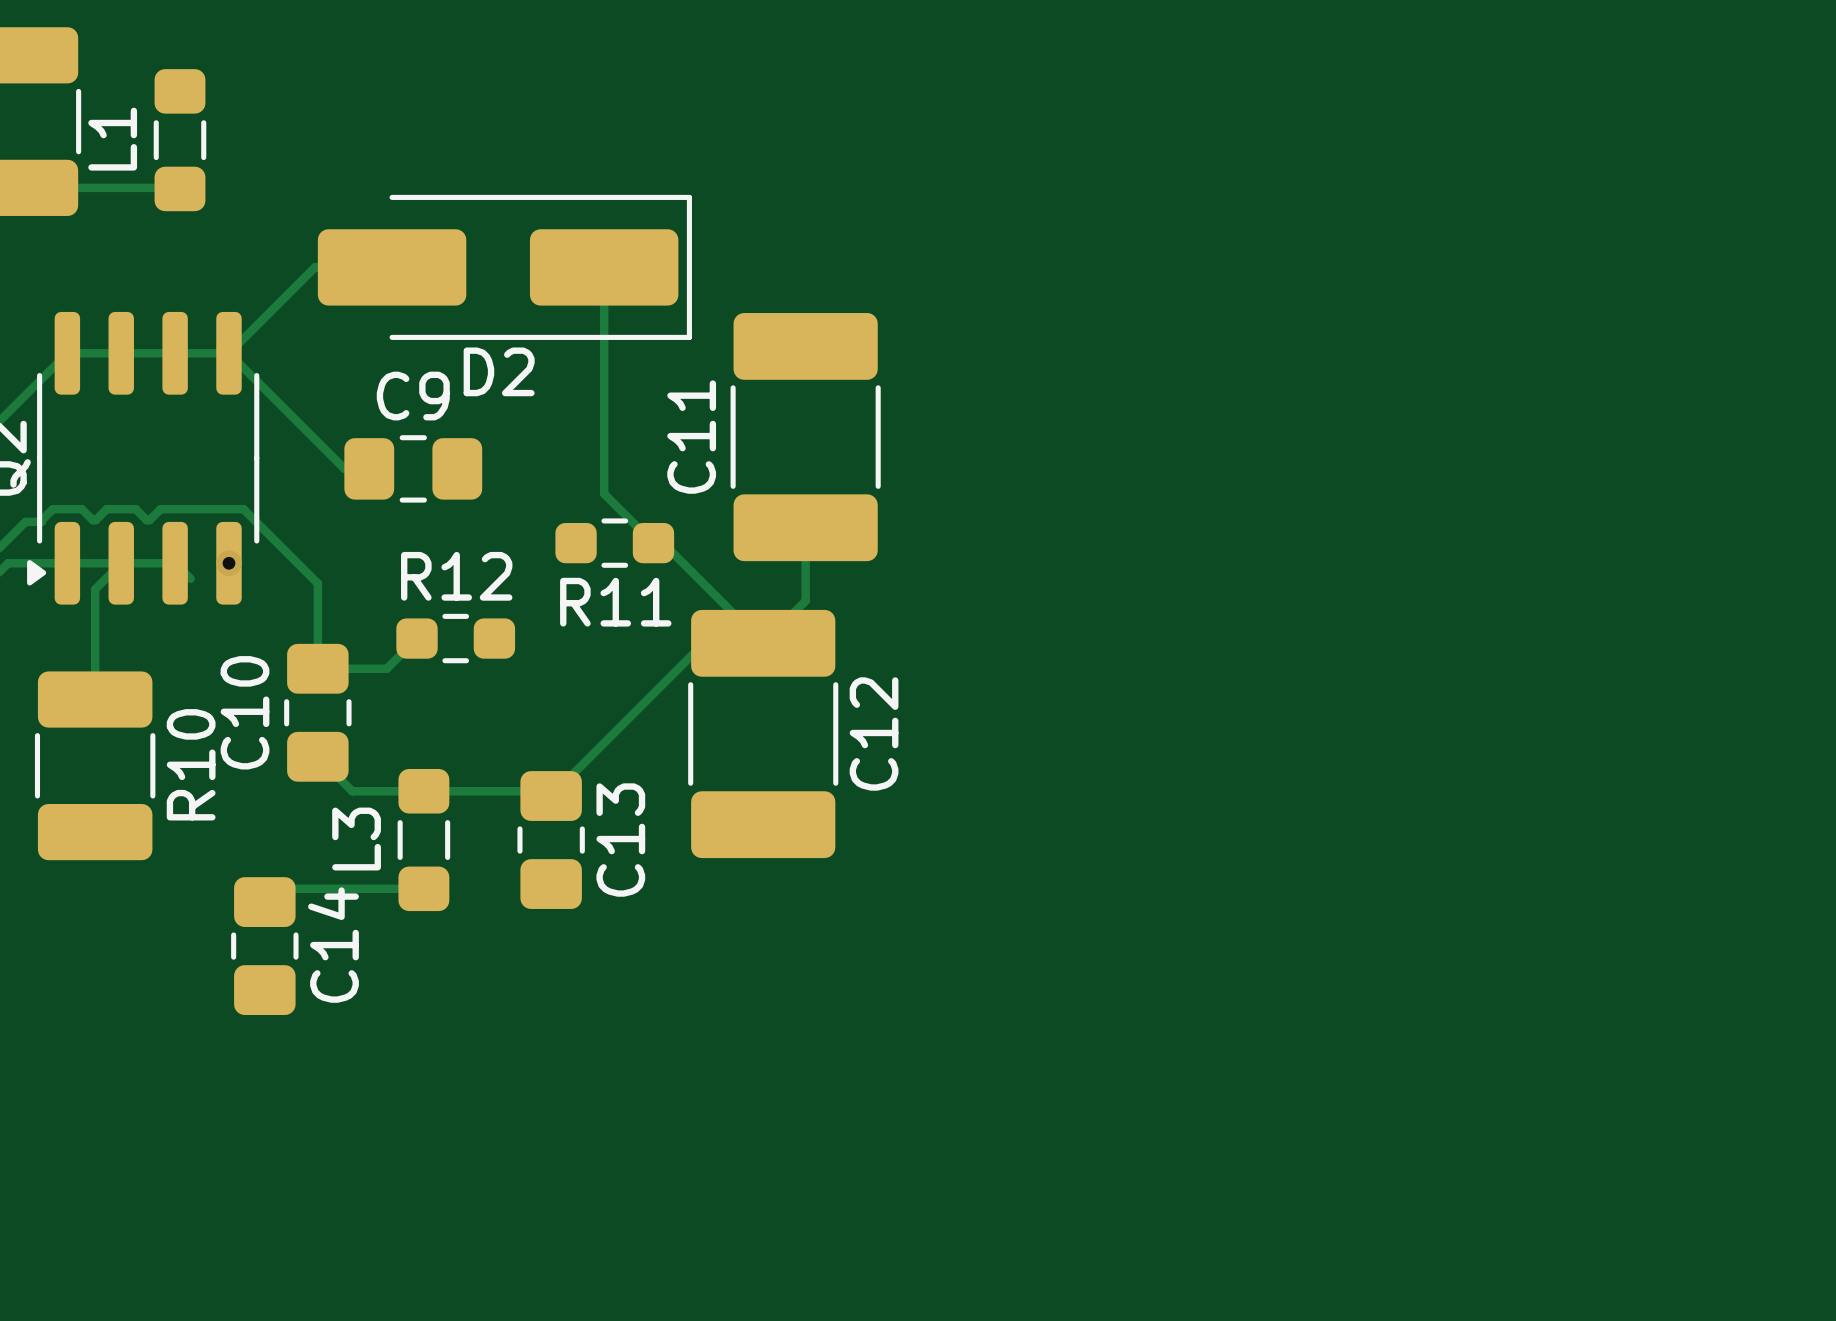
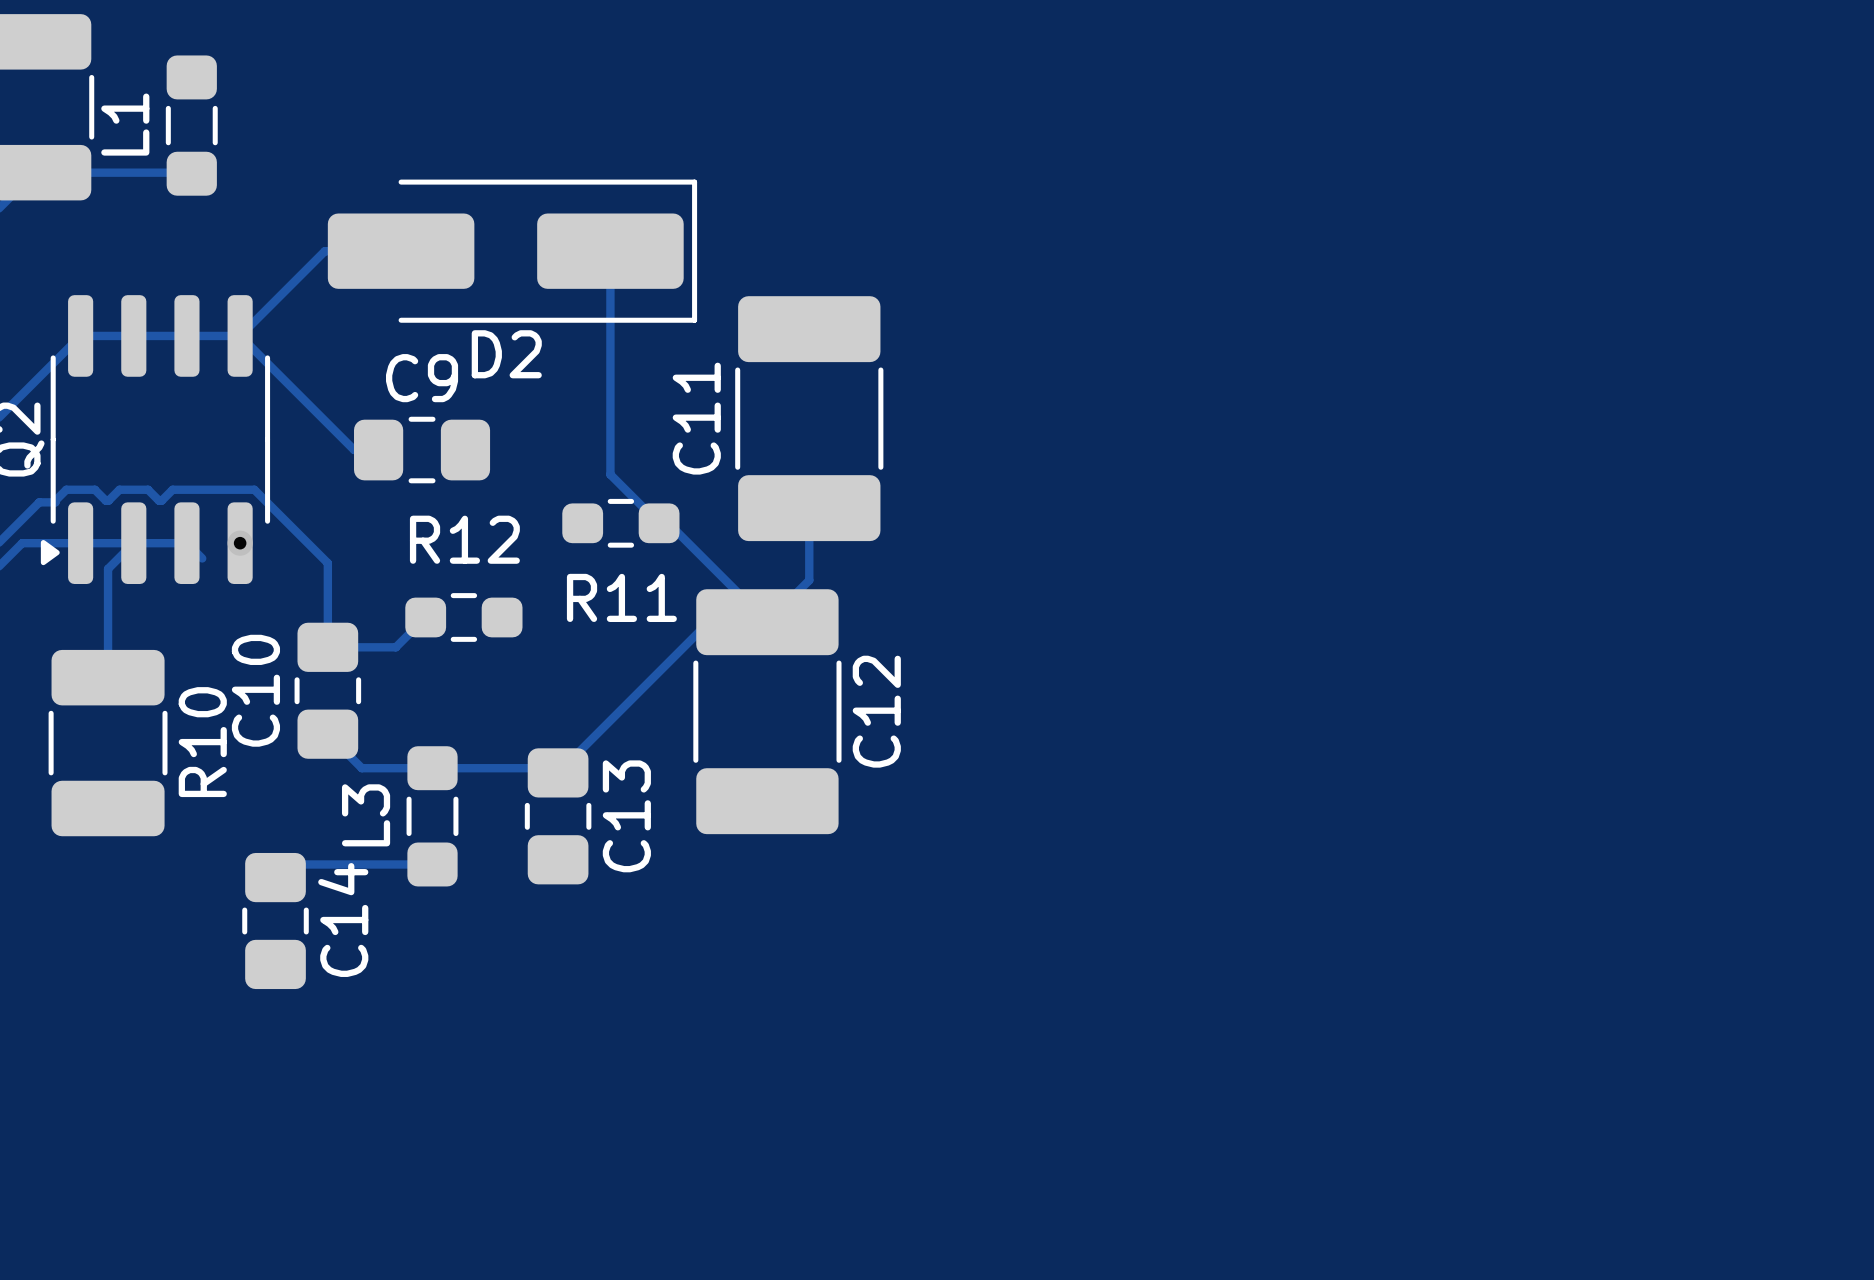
R12 name position: R12 (456, 576) -> R12 (464, 539)
R11 name position: R11 (615, 602) -> R11 (621, 597)

